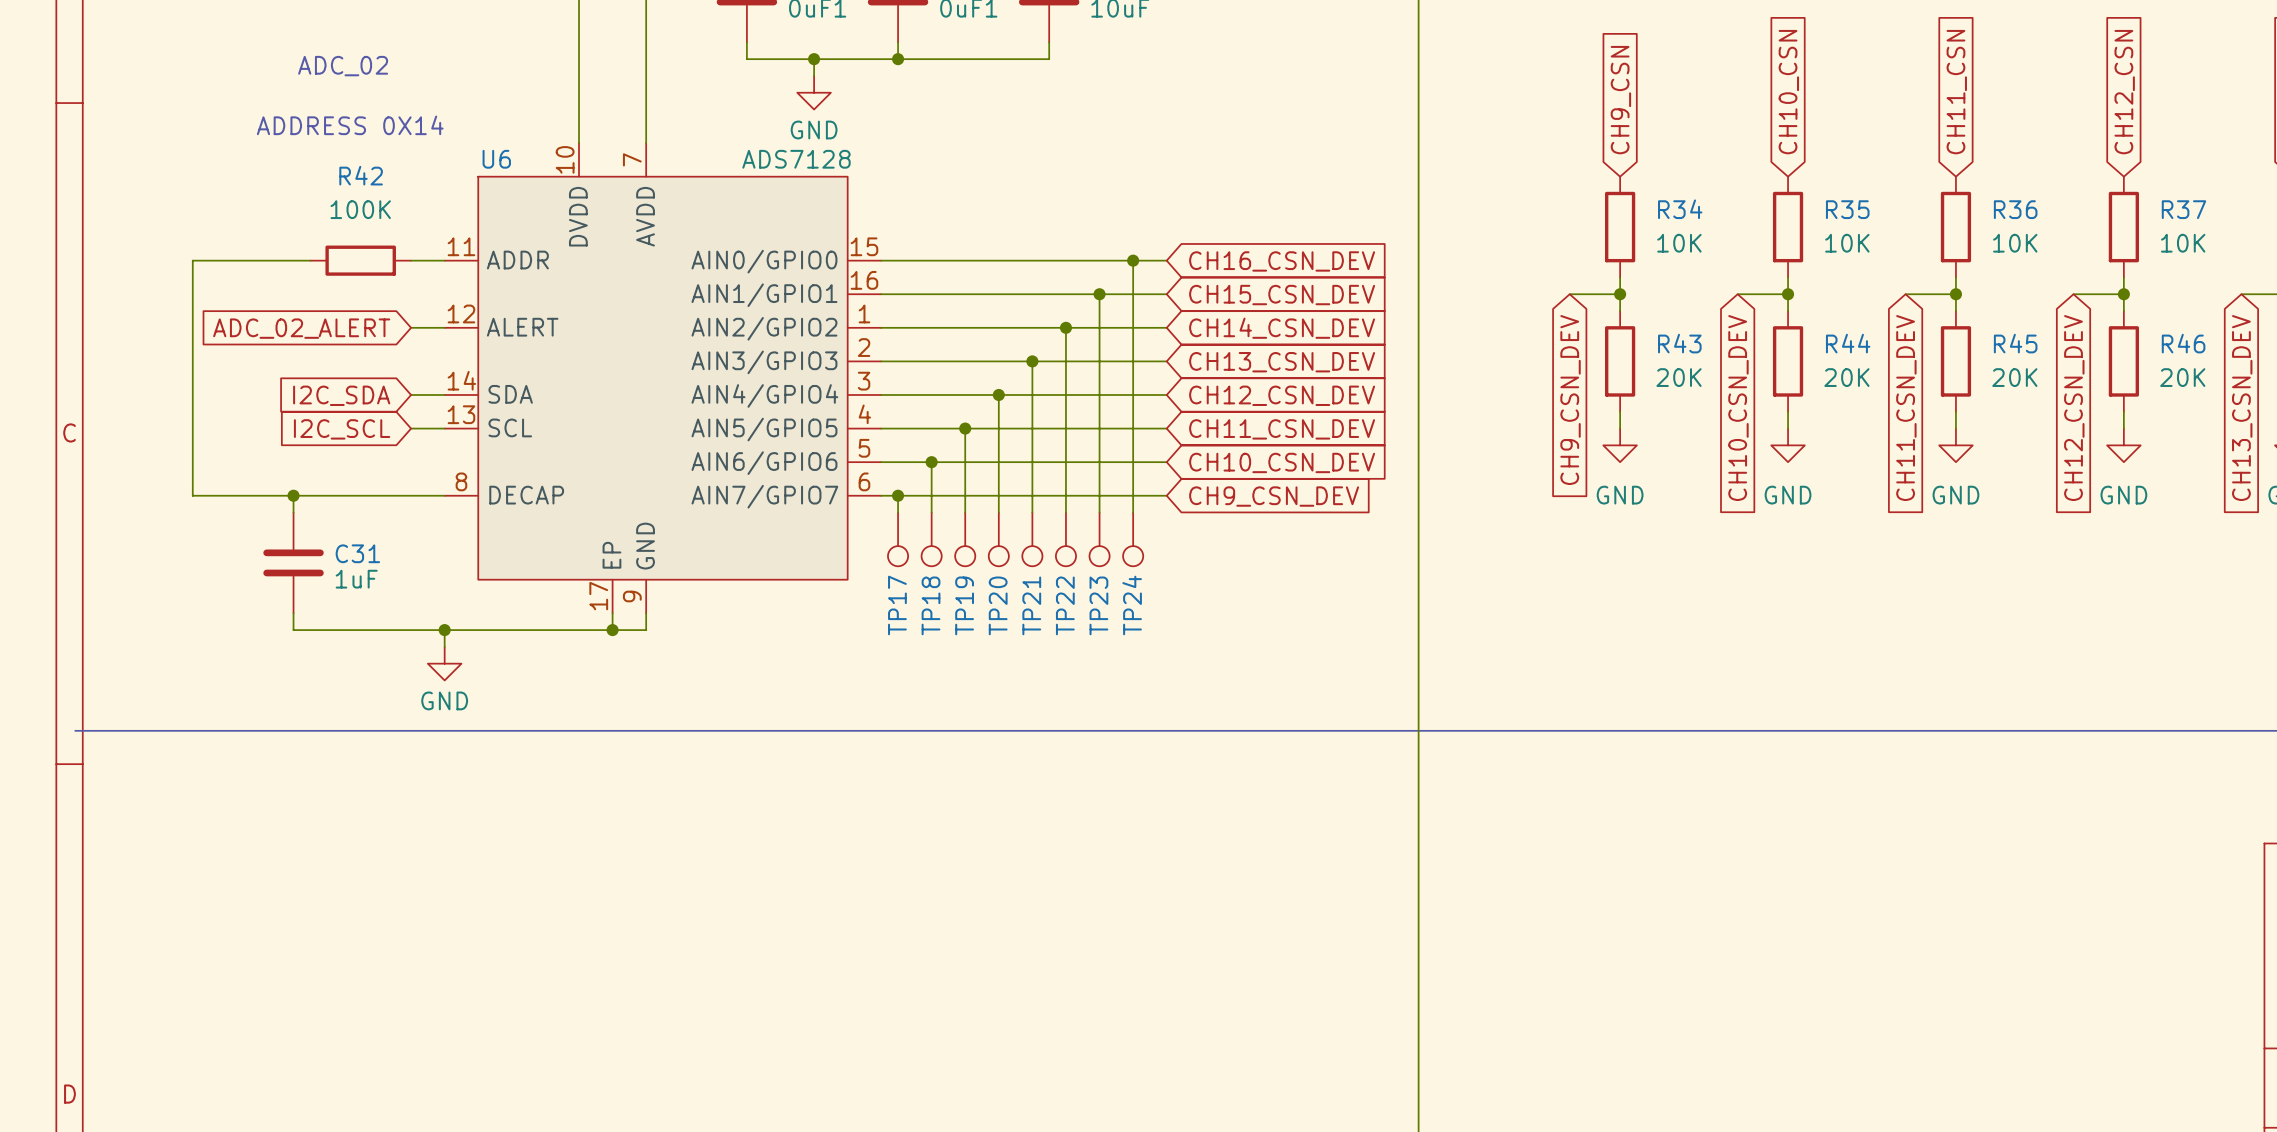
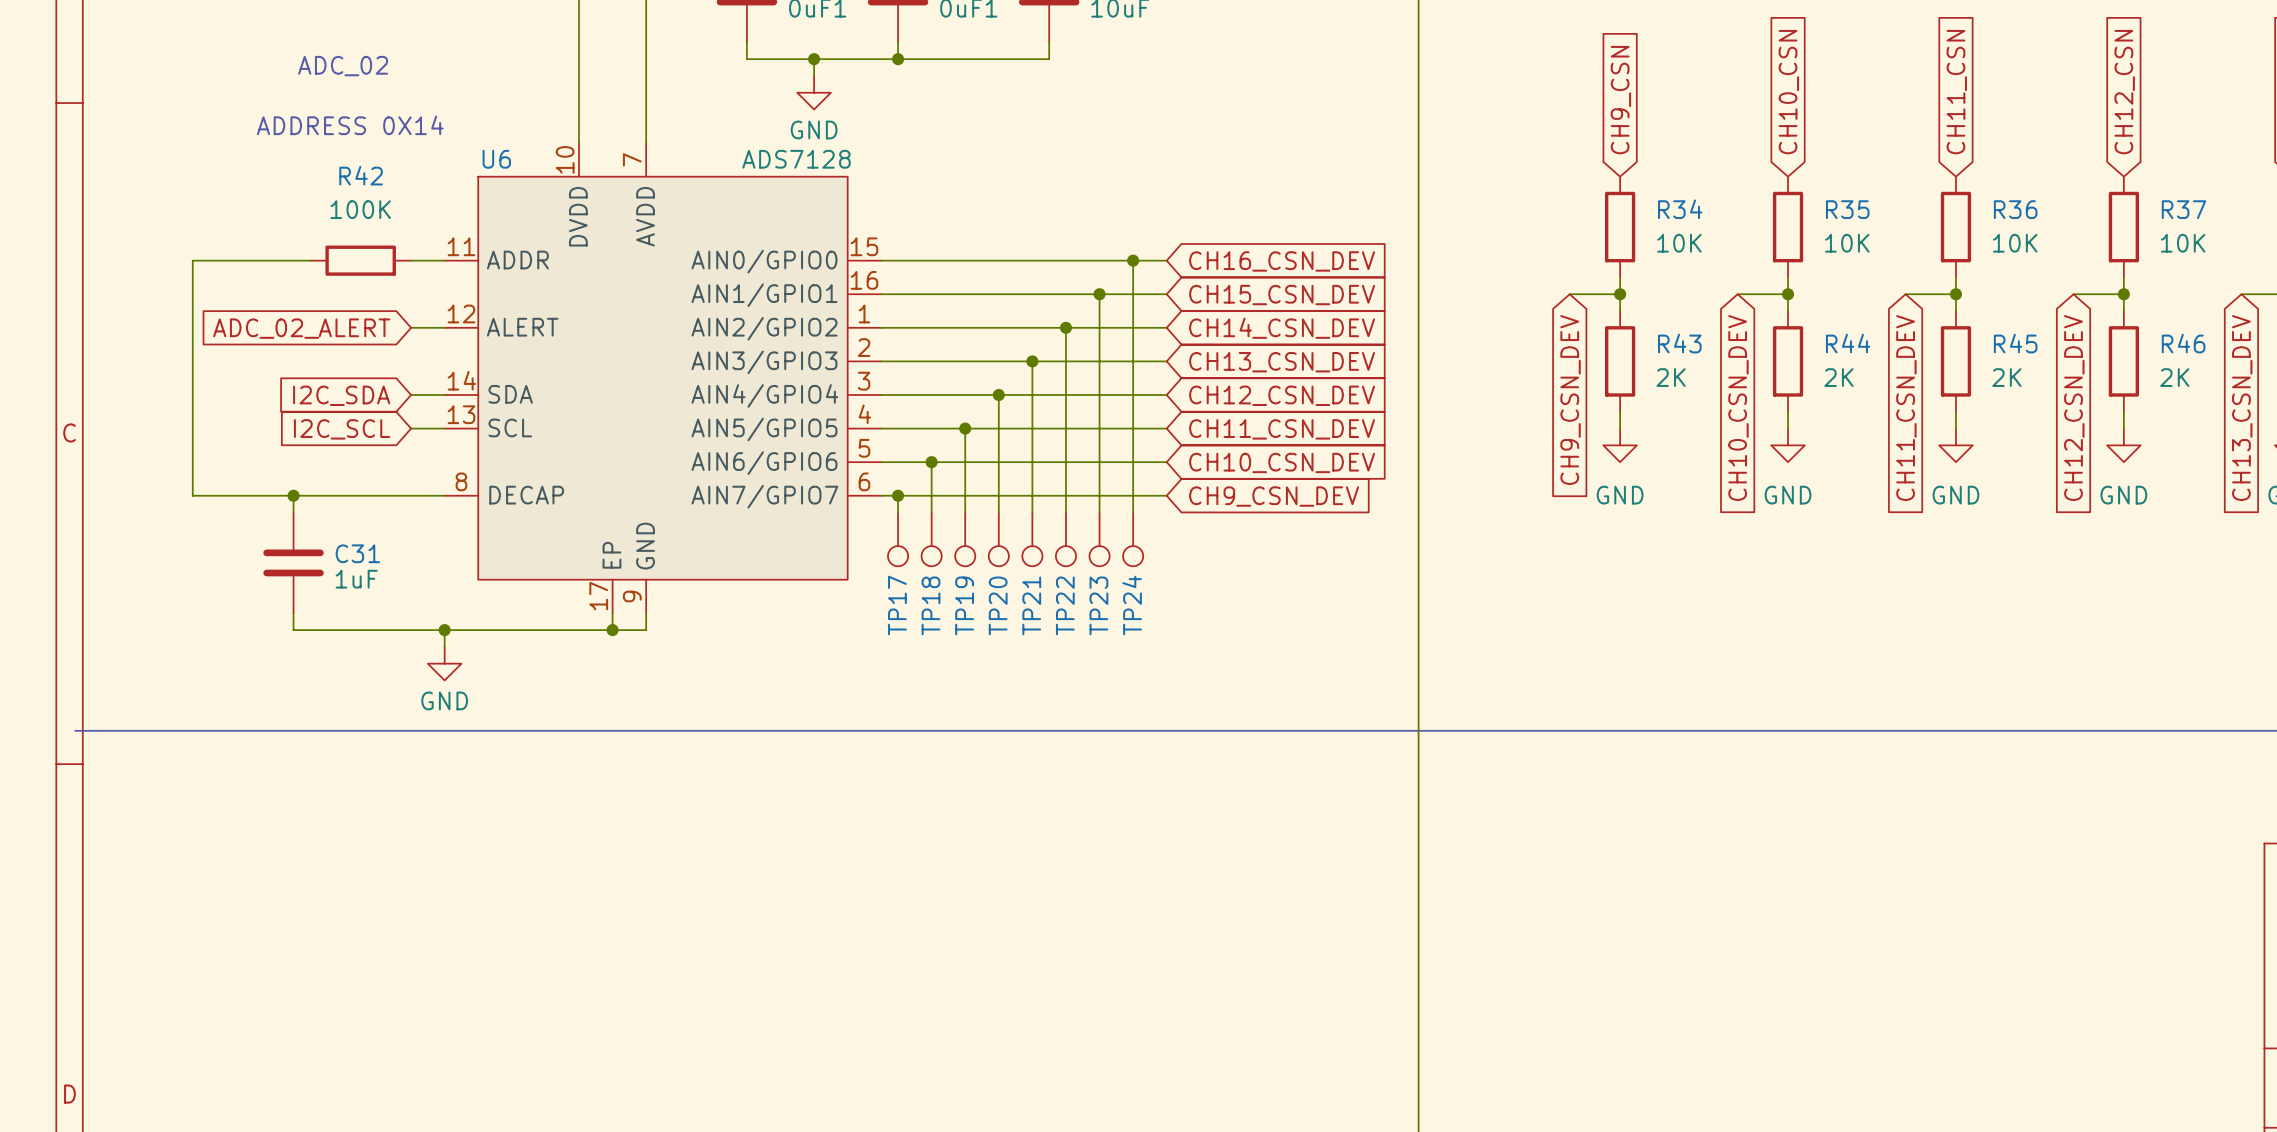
R43 value: 20K (1679, 377) -> 2K (1671, 377)
R44 value: 20K (1846, 377) -> 2K (1838, 377)
R45 value: 20K (2014, 377) -> 2K (2006, 377)
R46 value: 20K (2182, 377) -> 2K (2174, 377)

